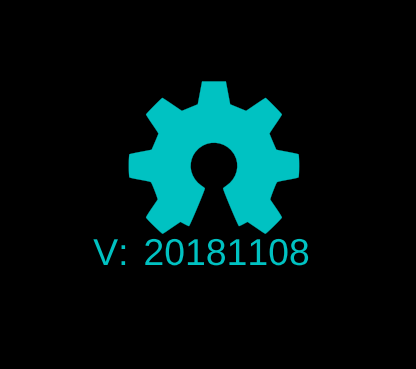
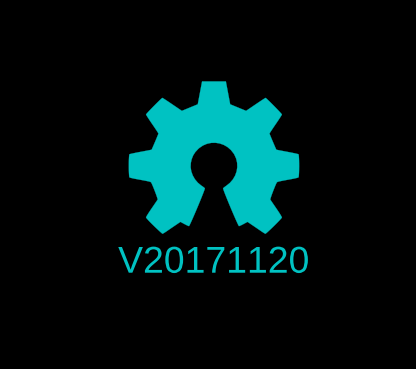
drawing shape: [93, 238, 309, 266] -> [118, 246, 308, 274]

